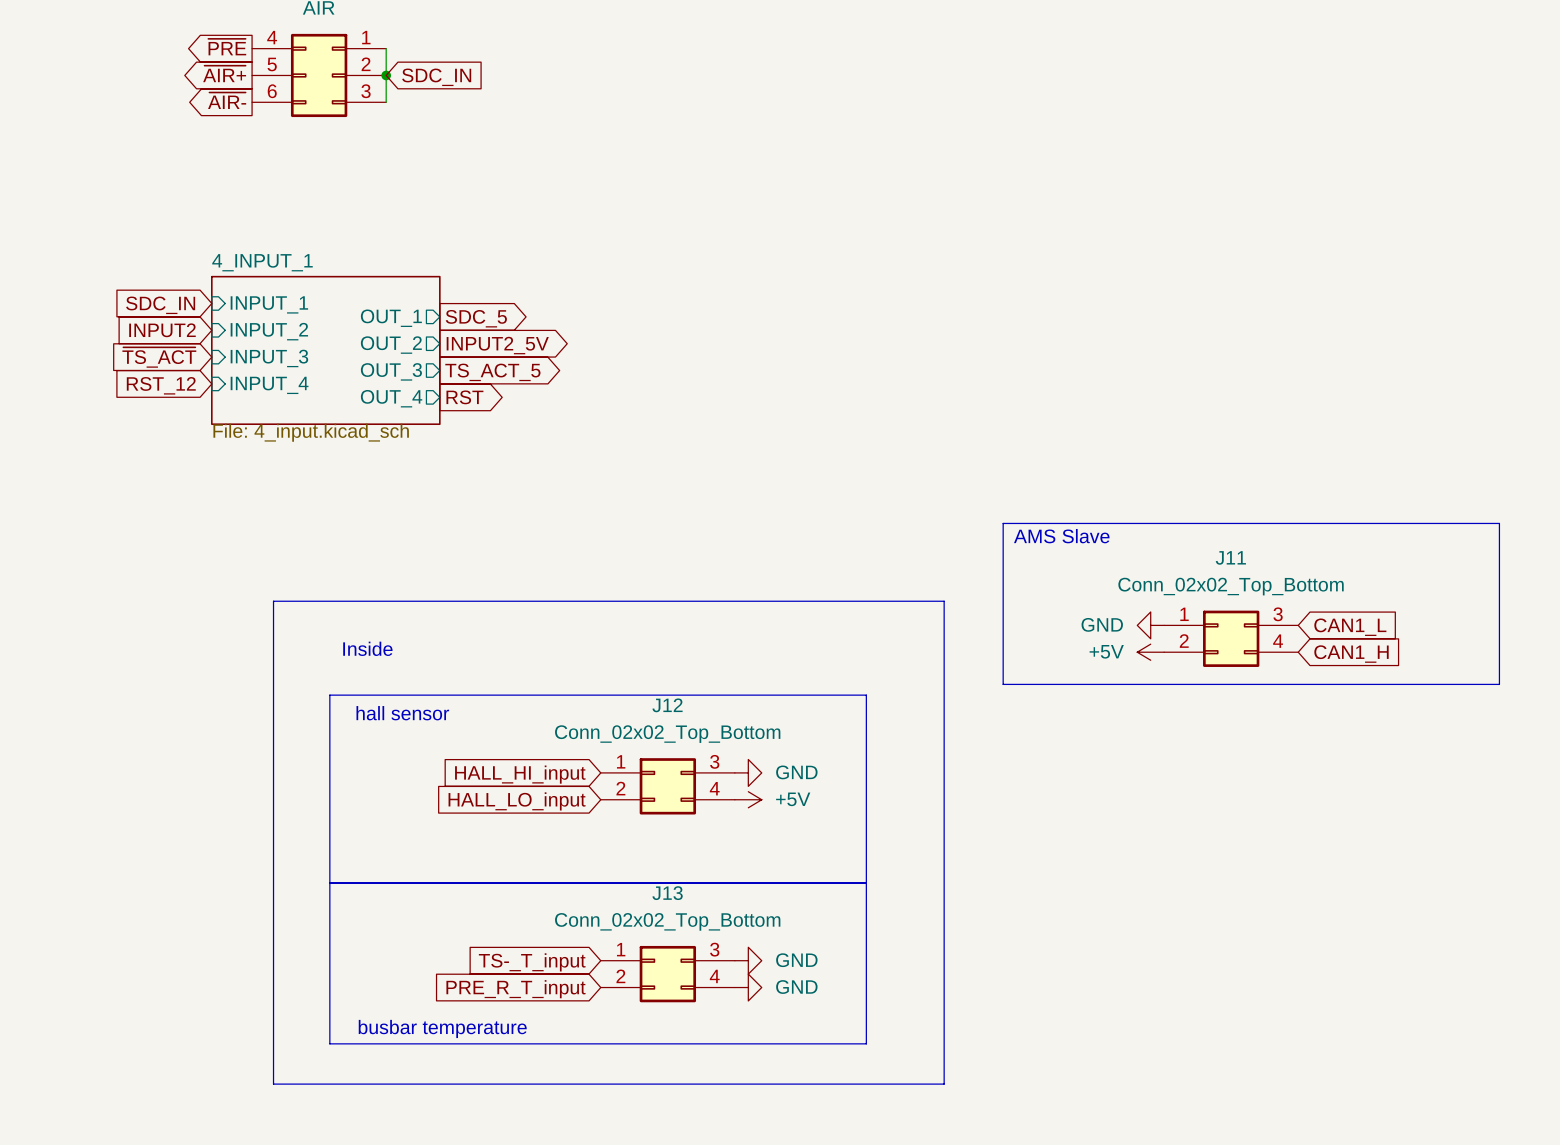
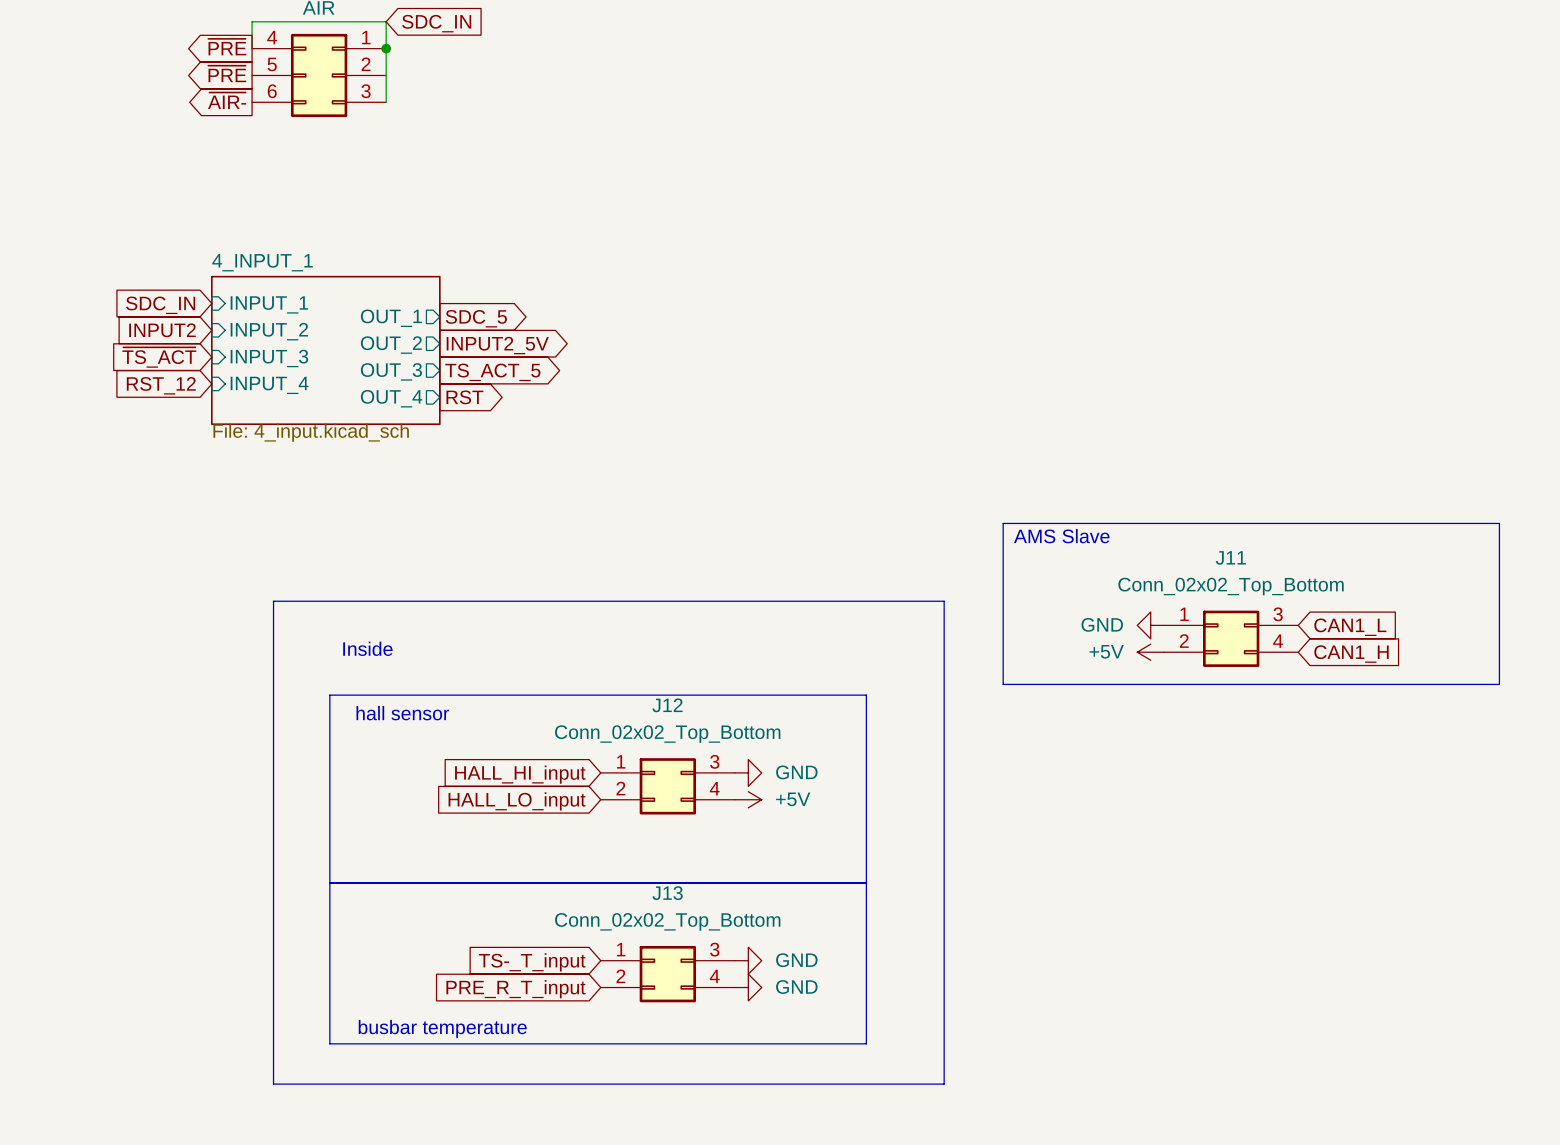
wire: none -> (252, 48) (252, 21) (386, 21) (386, 48)
global label: ~{AIR+} (224, 73) -> ~{PRE} (227, 73)
junction position: (386, 75) -> (386, 48)
global label position: SDC_IN (436, 77) -> SDC_IN (436, 23)

